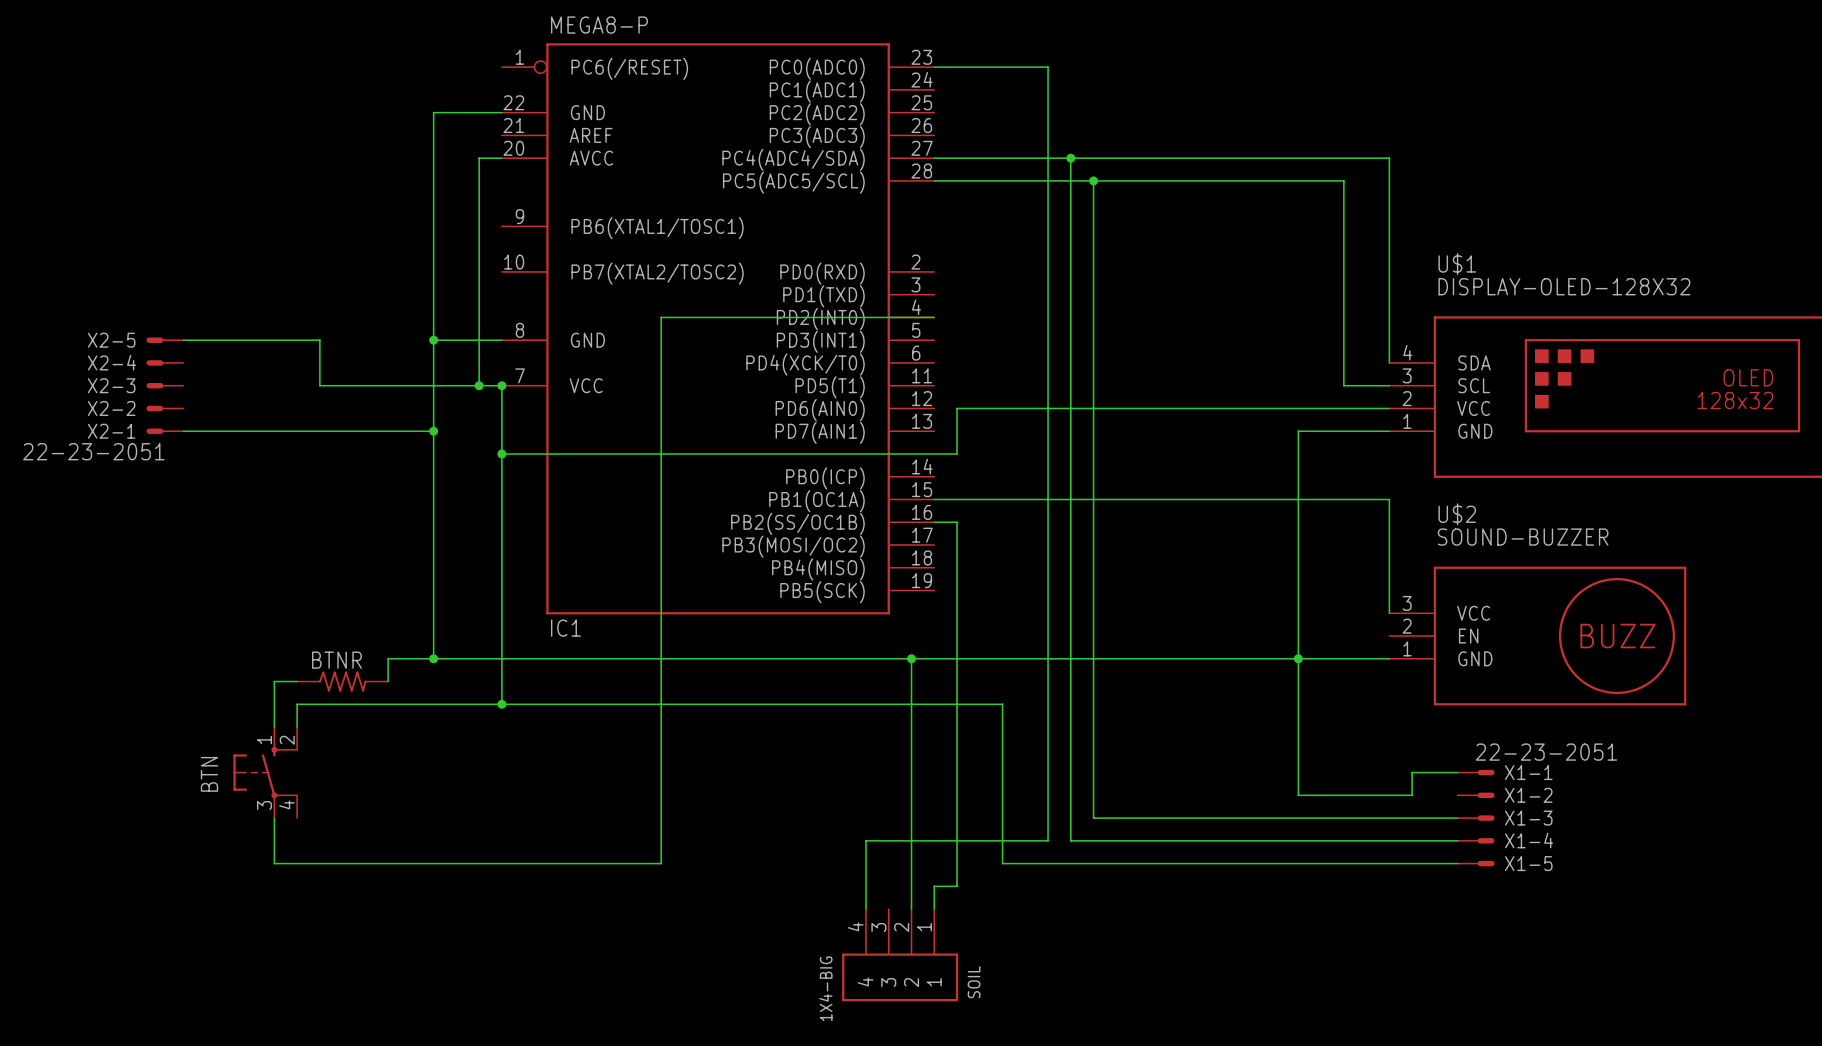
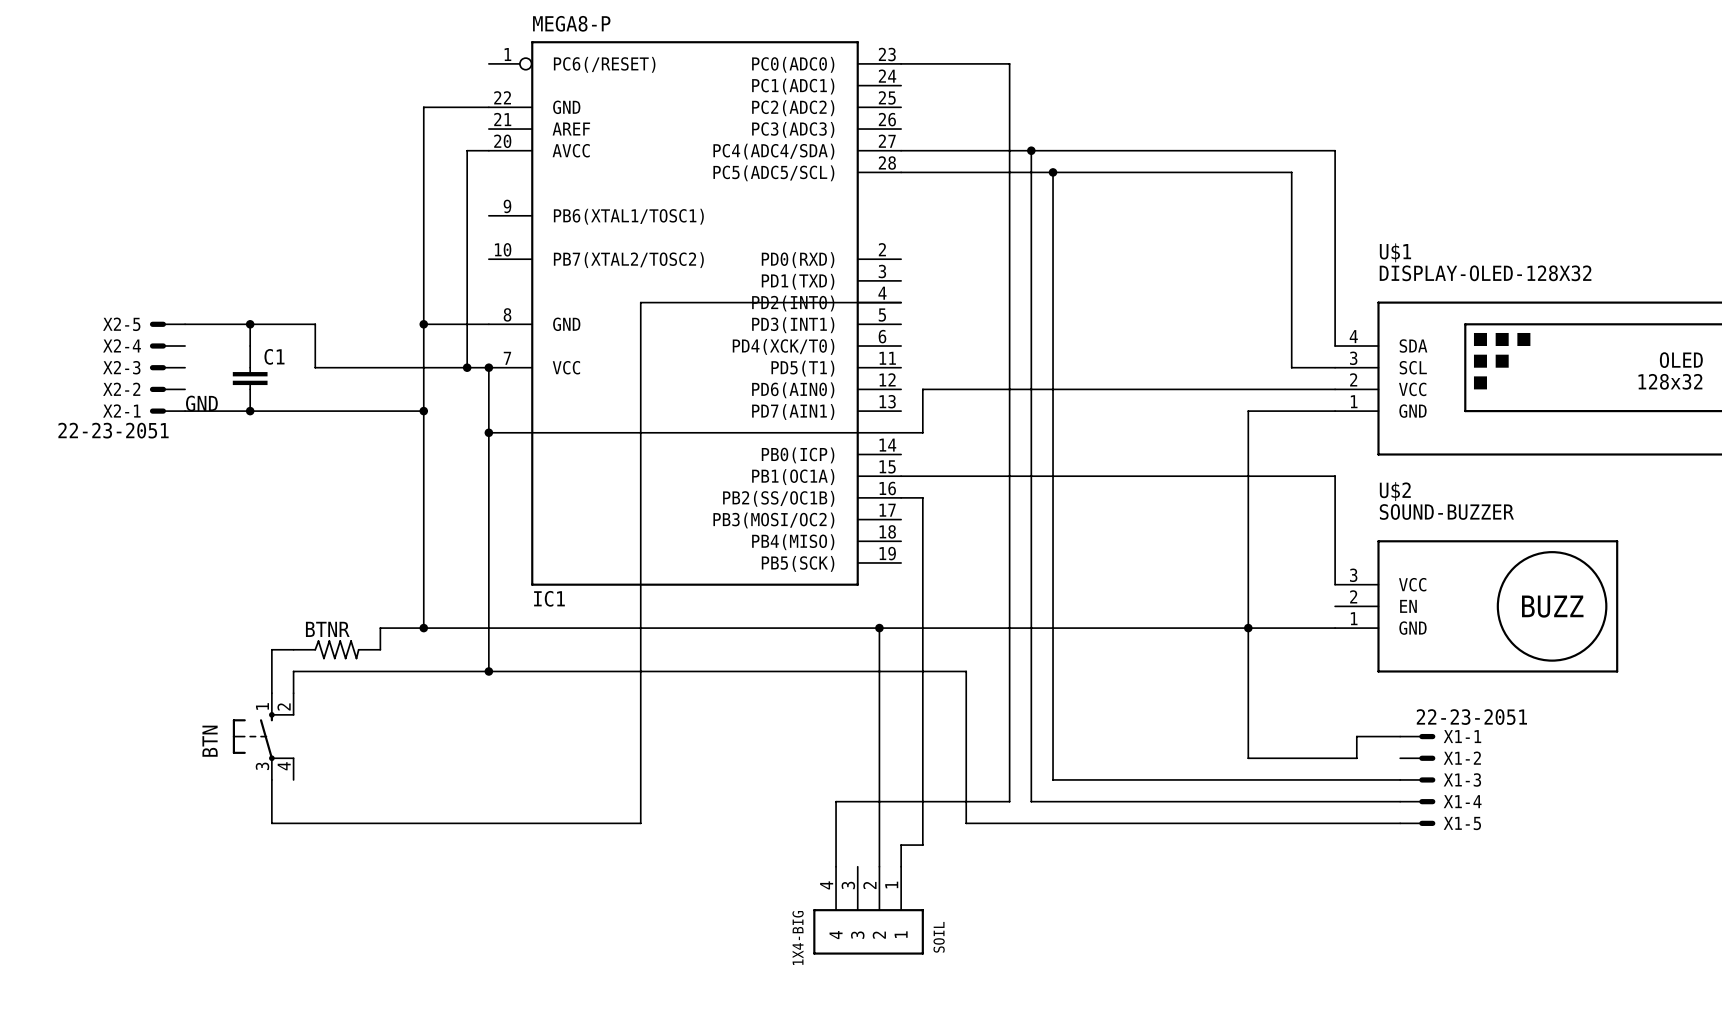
wire: none -> (250, 324) (250, 346)
junction: none -> (250, 324)
C1: none -> (250, 378)
label: none -> GND (201, 403)
junction: none -> (250, 411)

